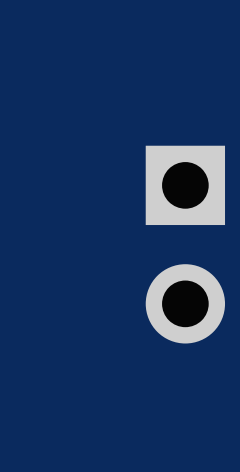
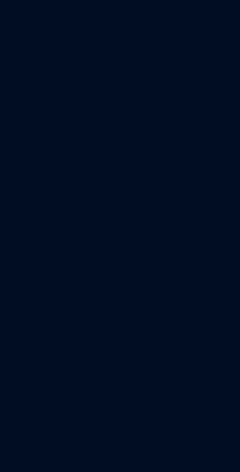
part: (185, 244) -> none

